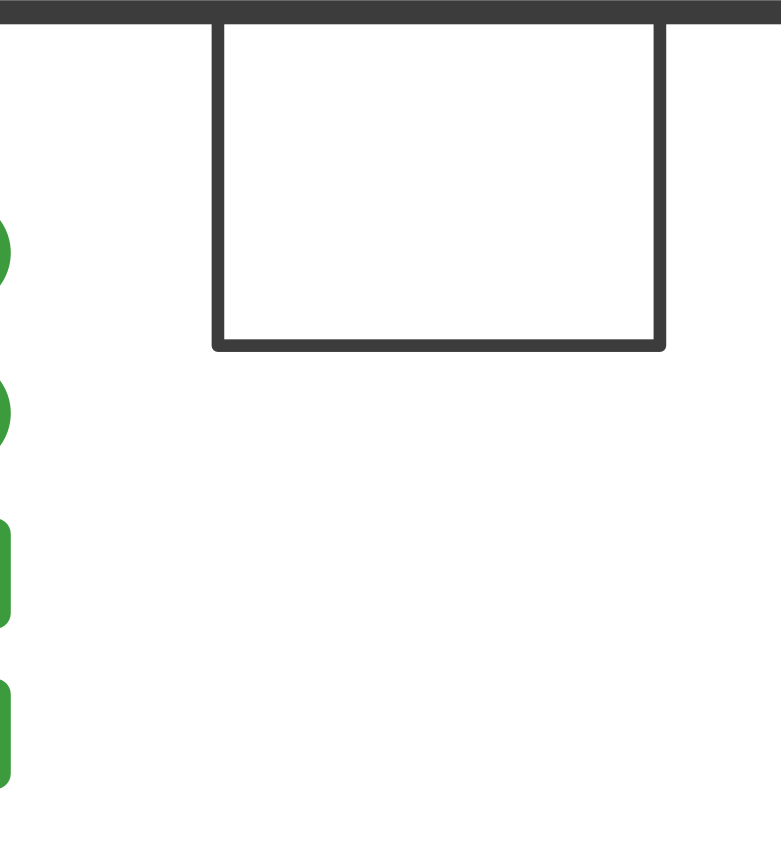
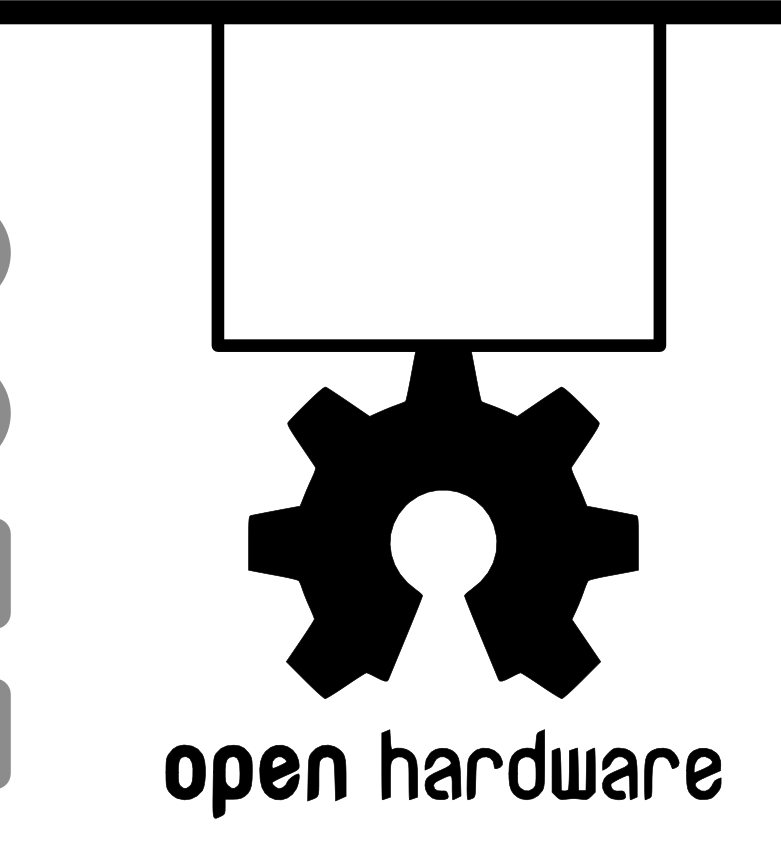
drawing: none -> [165, 348, 722, 819]

